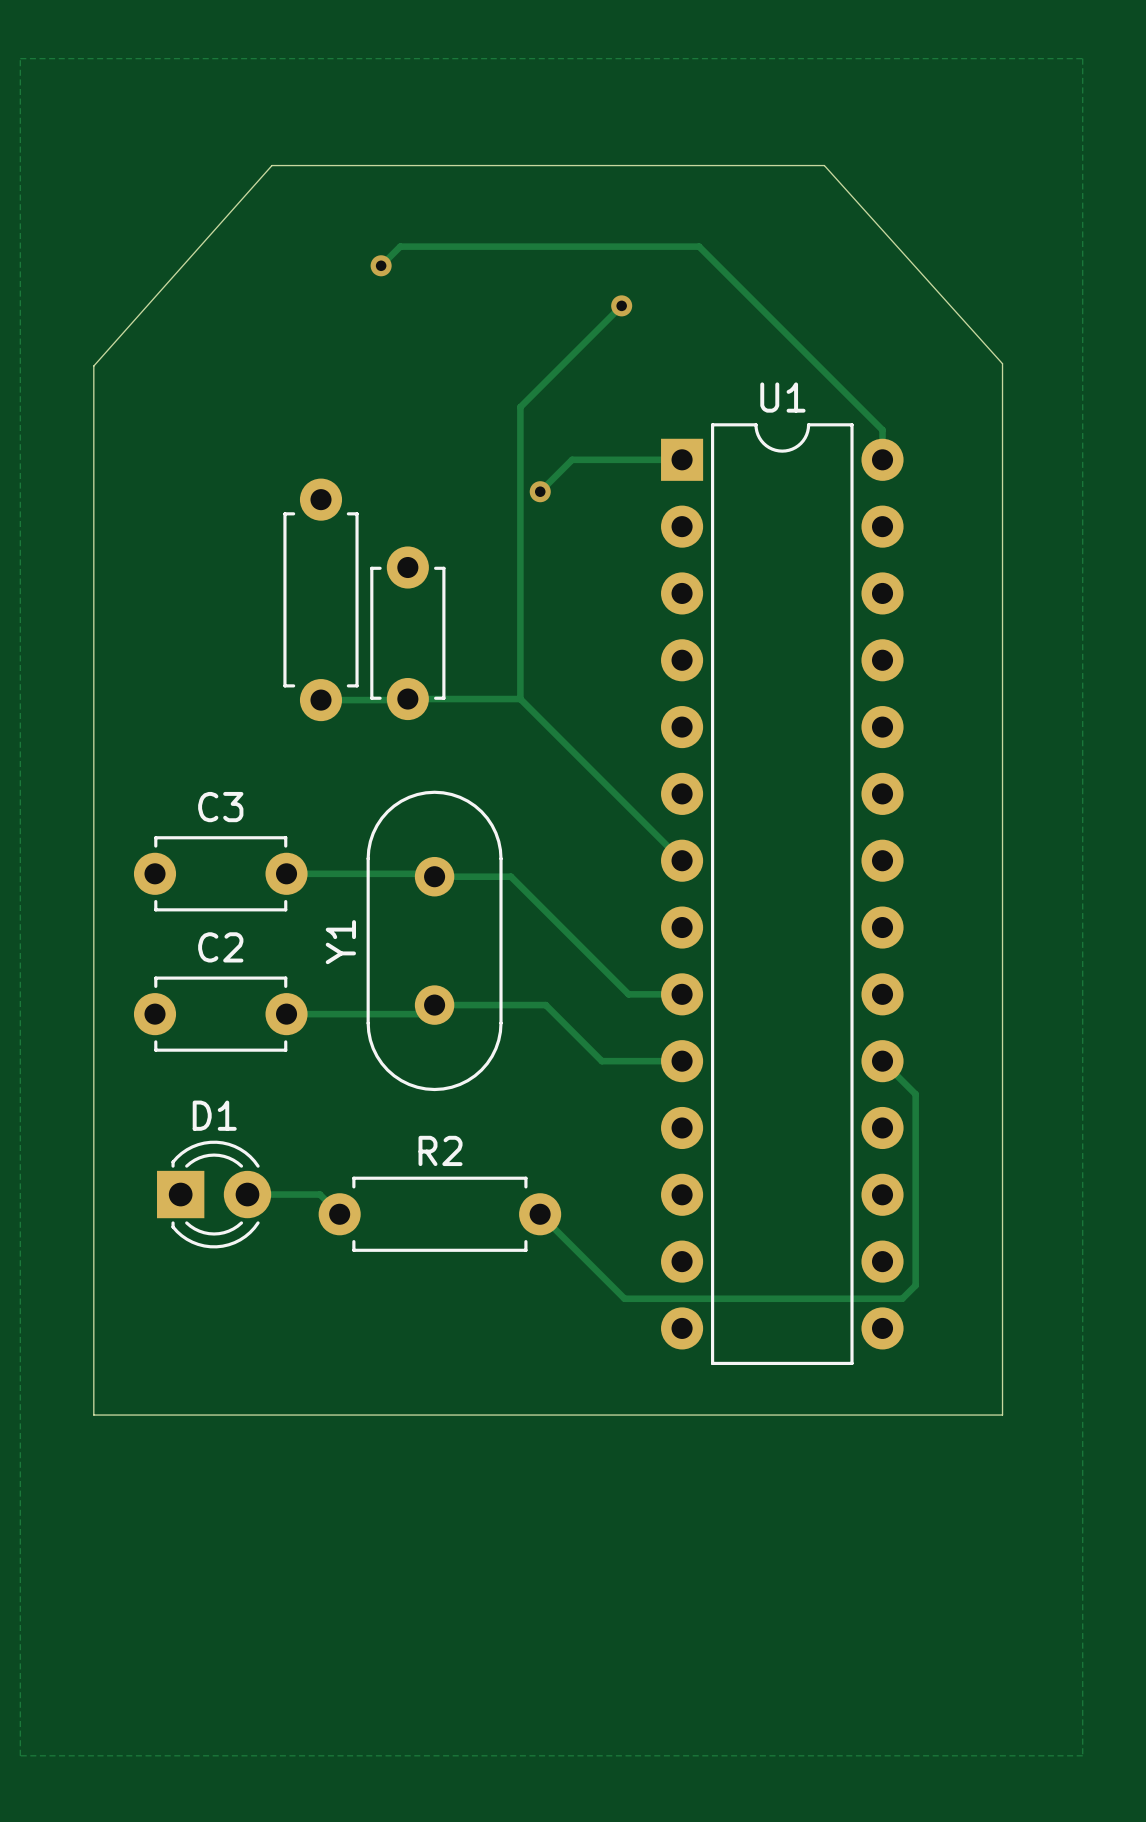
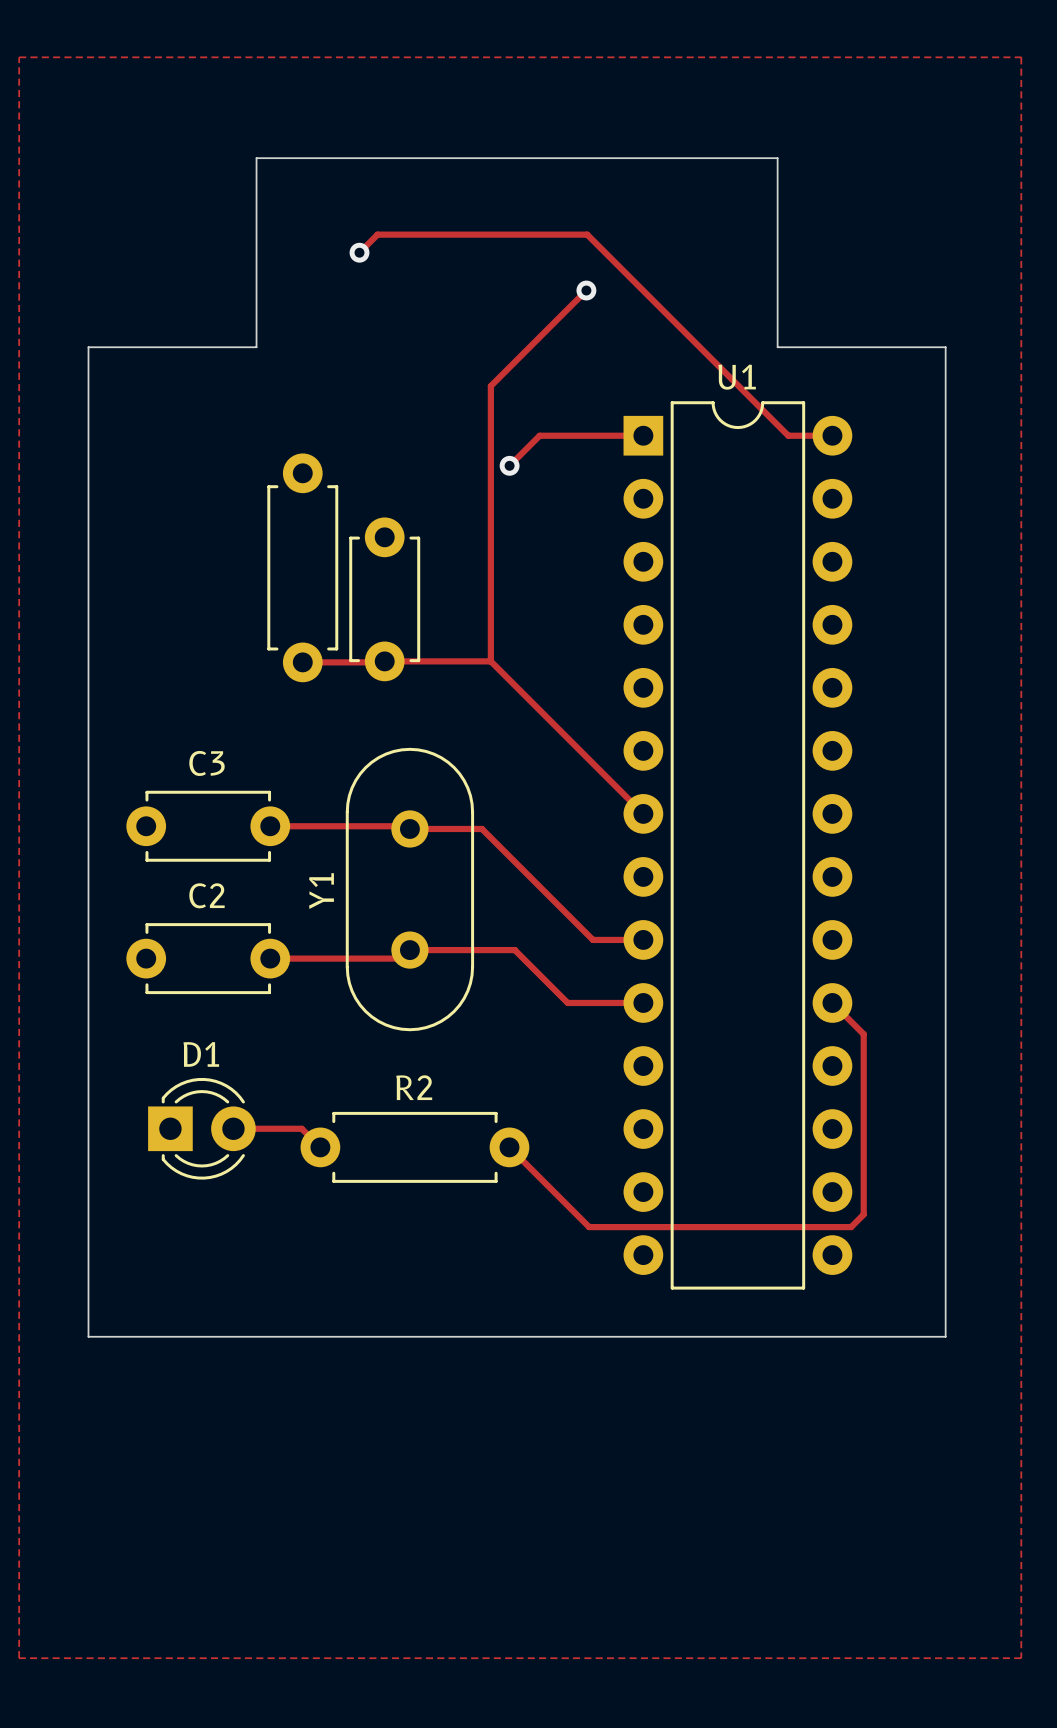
board edge: (271, 165) (93, 366) -> (256, 158) (256, 347) (88, 347)
board edge: (824, 165) (1002, 363) (1002, 366) -> (777, 158) (777, 347) (945, 347)
track: (622, 246) (699, 246) (882, 430) (882, 459) -> (587, 234) (788, 435) (832, 435)

